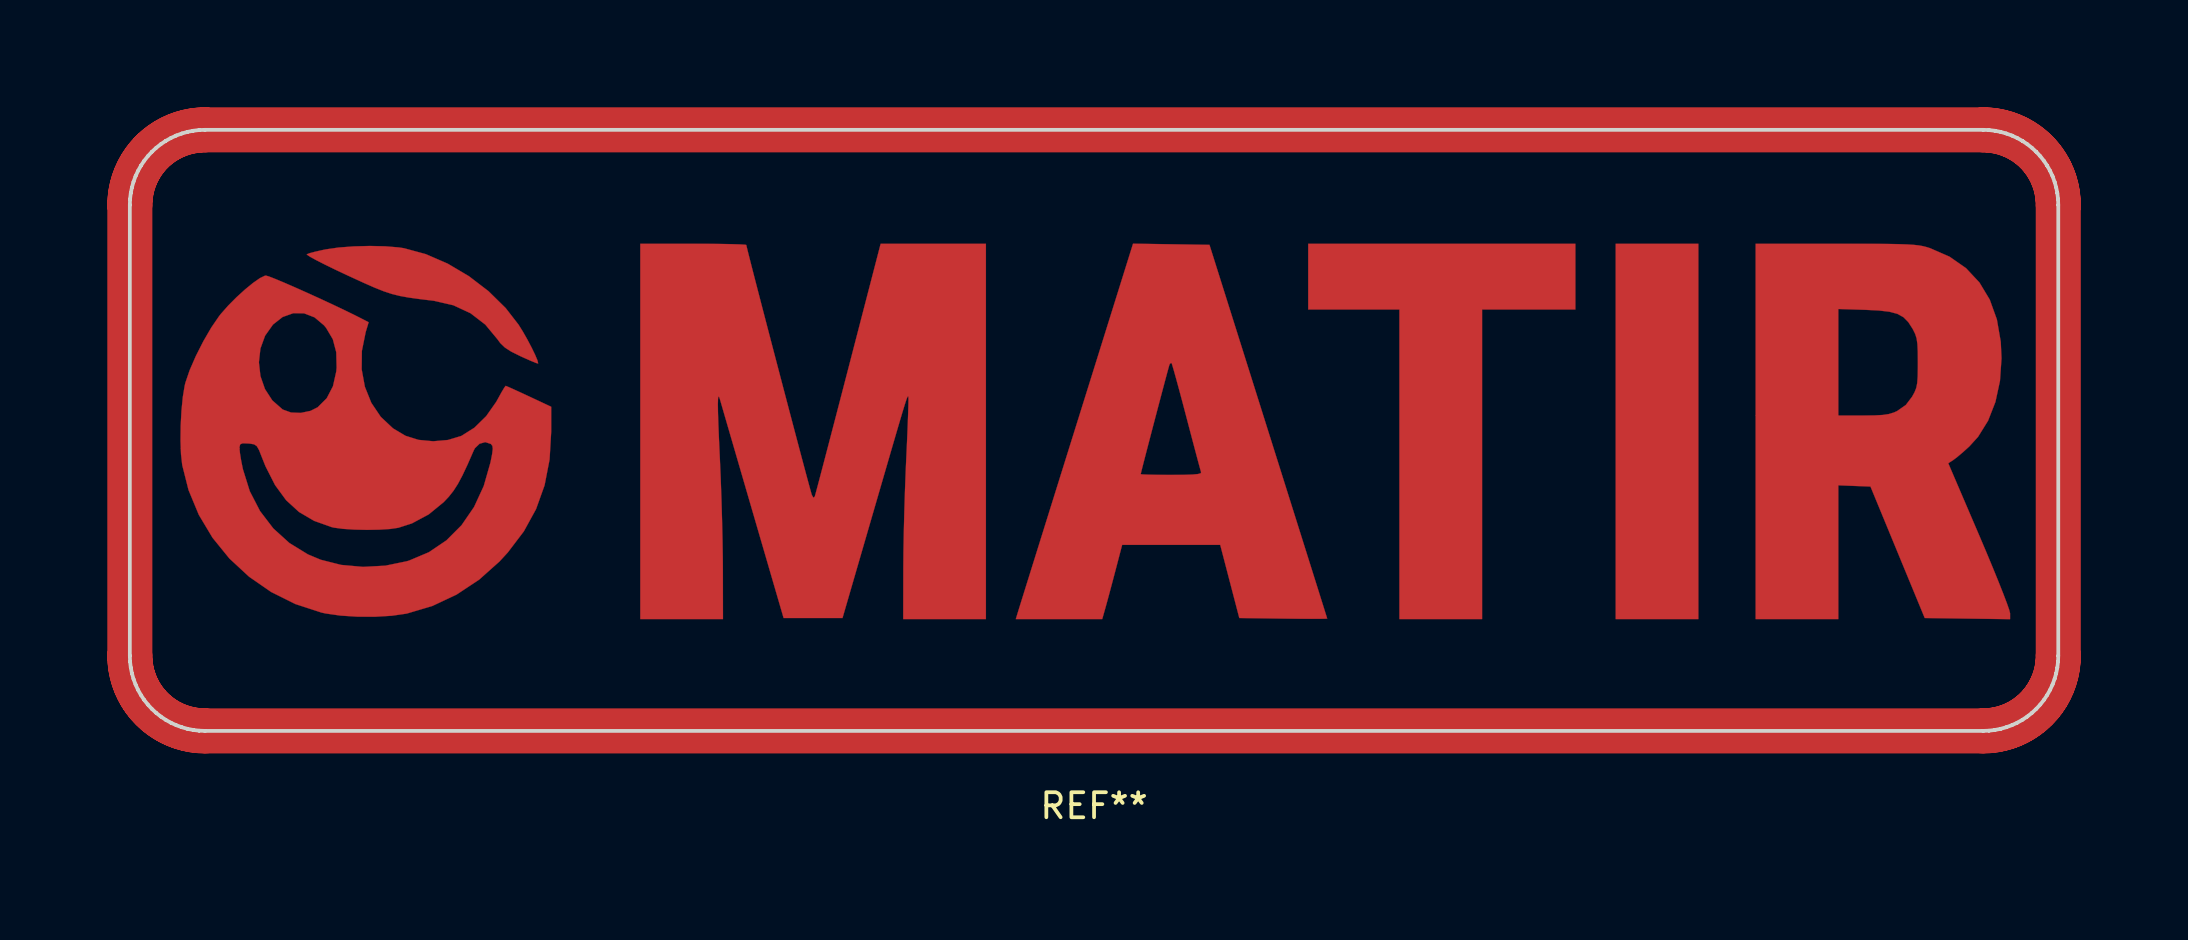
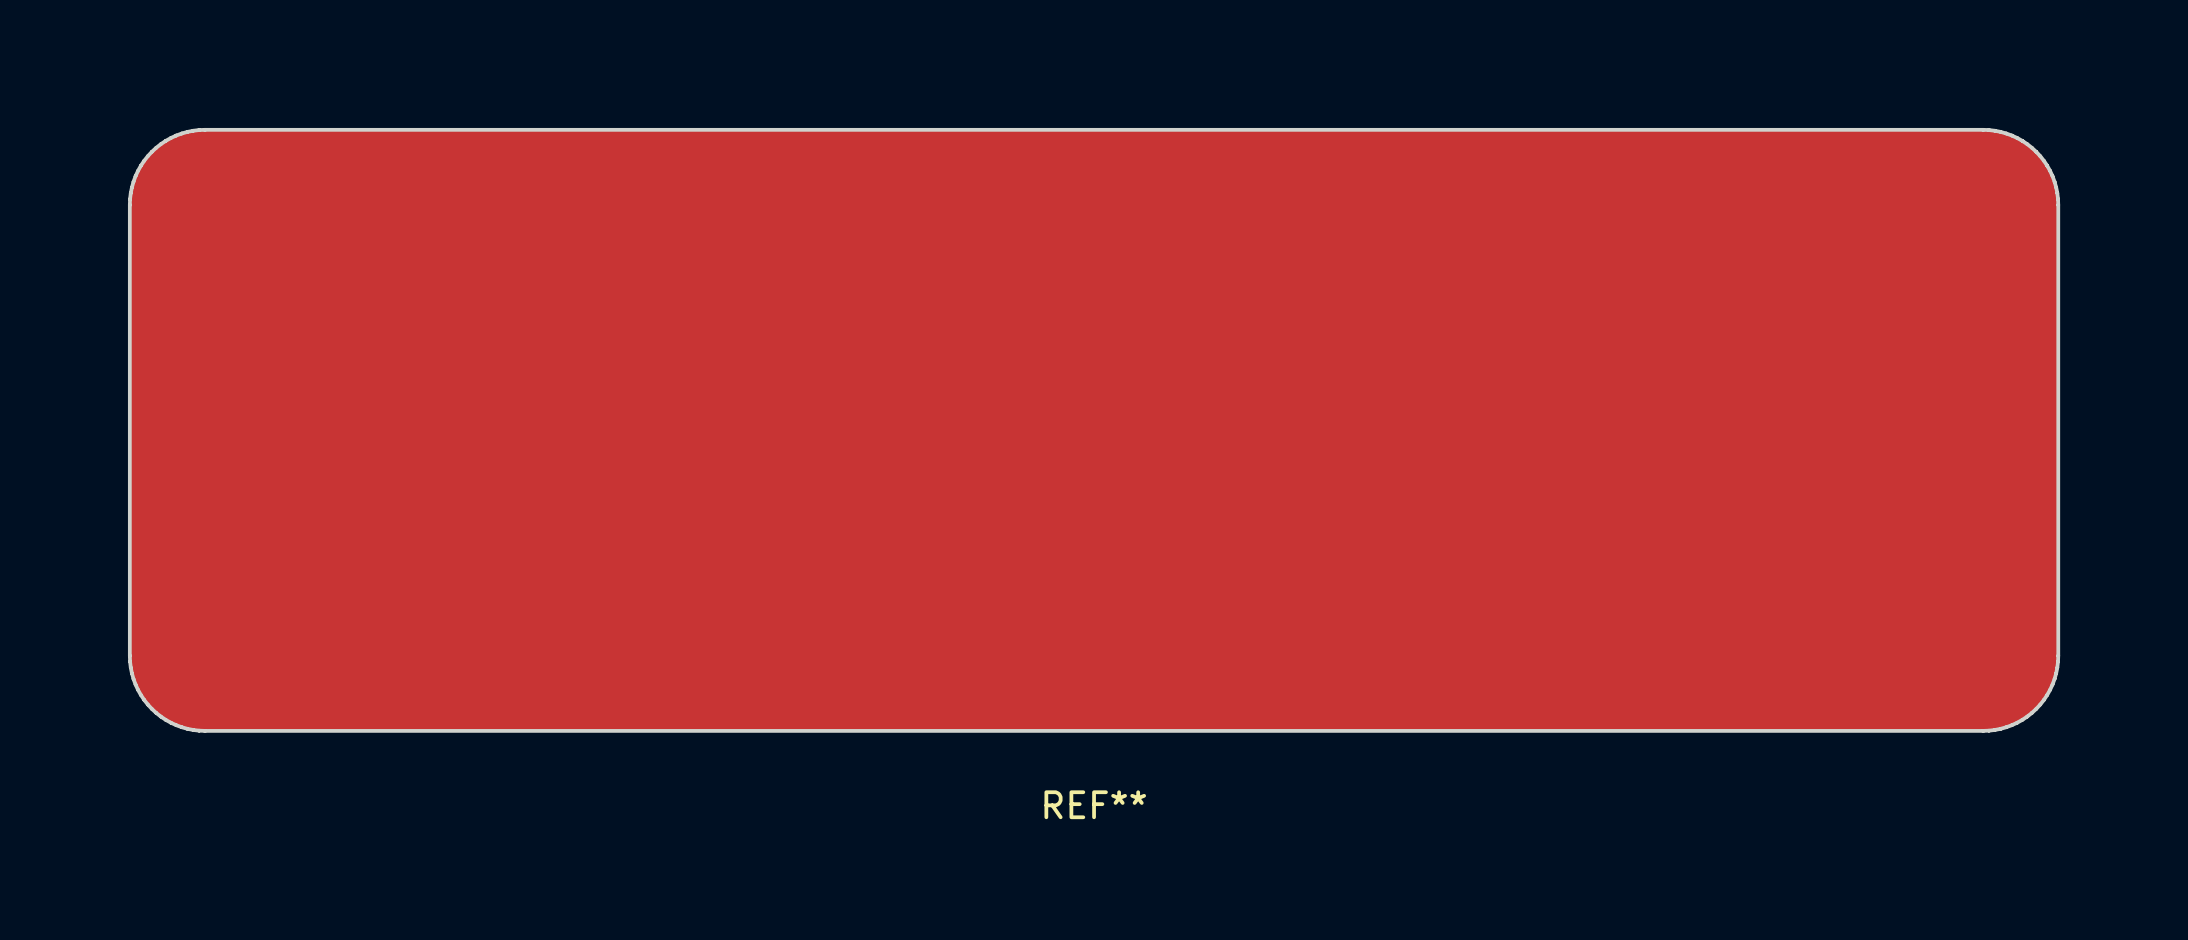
REF** footprint: [107, 107, 2081, 754] -> [127, 127, 2061, 733]
drawing: [180, 243, 2011, 620] -> none

